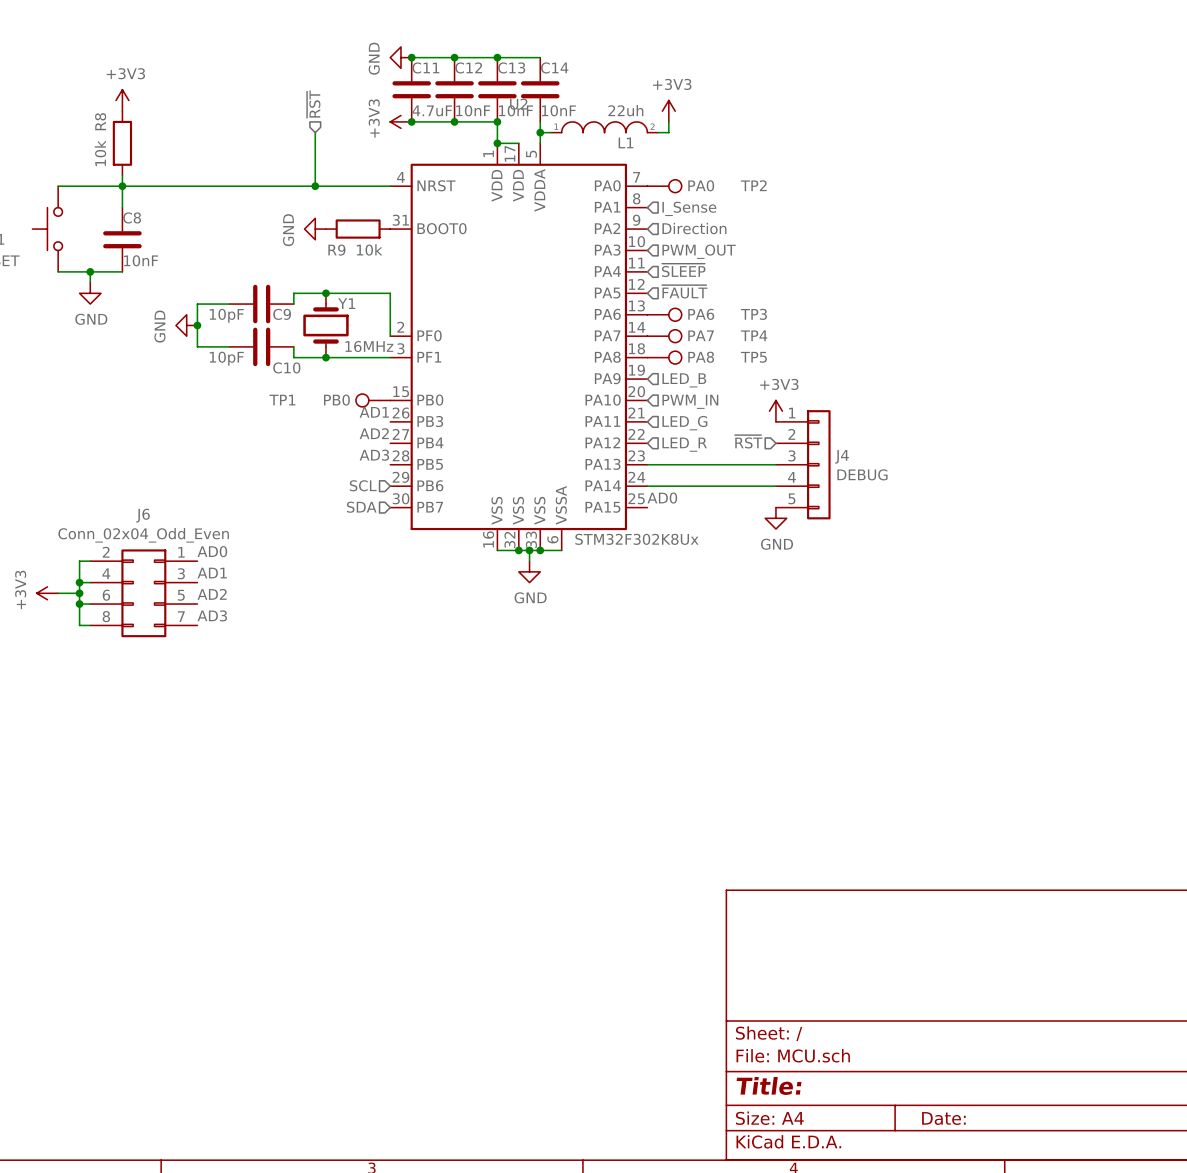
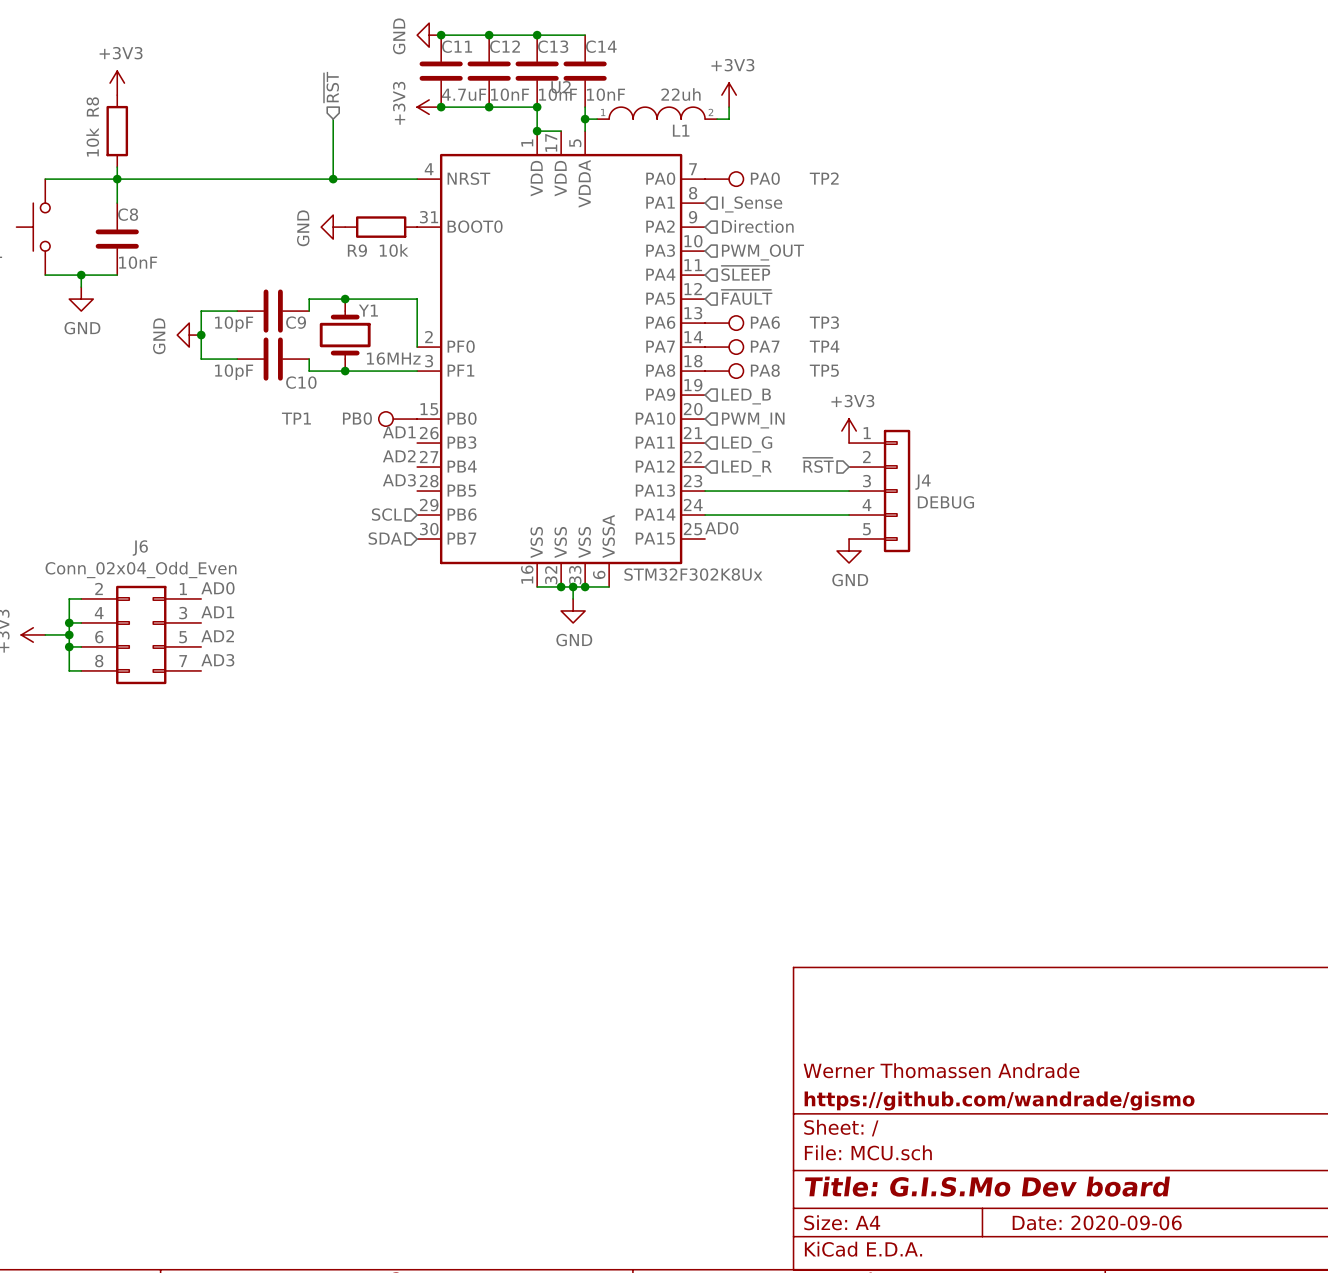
title block: none -> Werner Thomassen Andrade (941, 1070)
title block: none -> https://github.com/wandrade/gismo (999, 1100)
title block: Title: (769, 1085) -> Title: G.I.S.Mo Dev board (987, 1186)
title block: Date: (943, 1118) -> Date: 2020-09-06 (1097, 1222)

